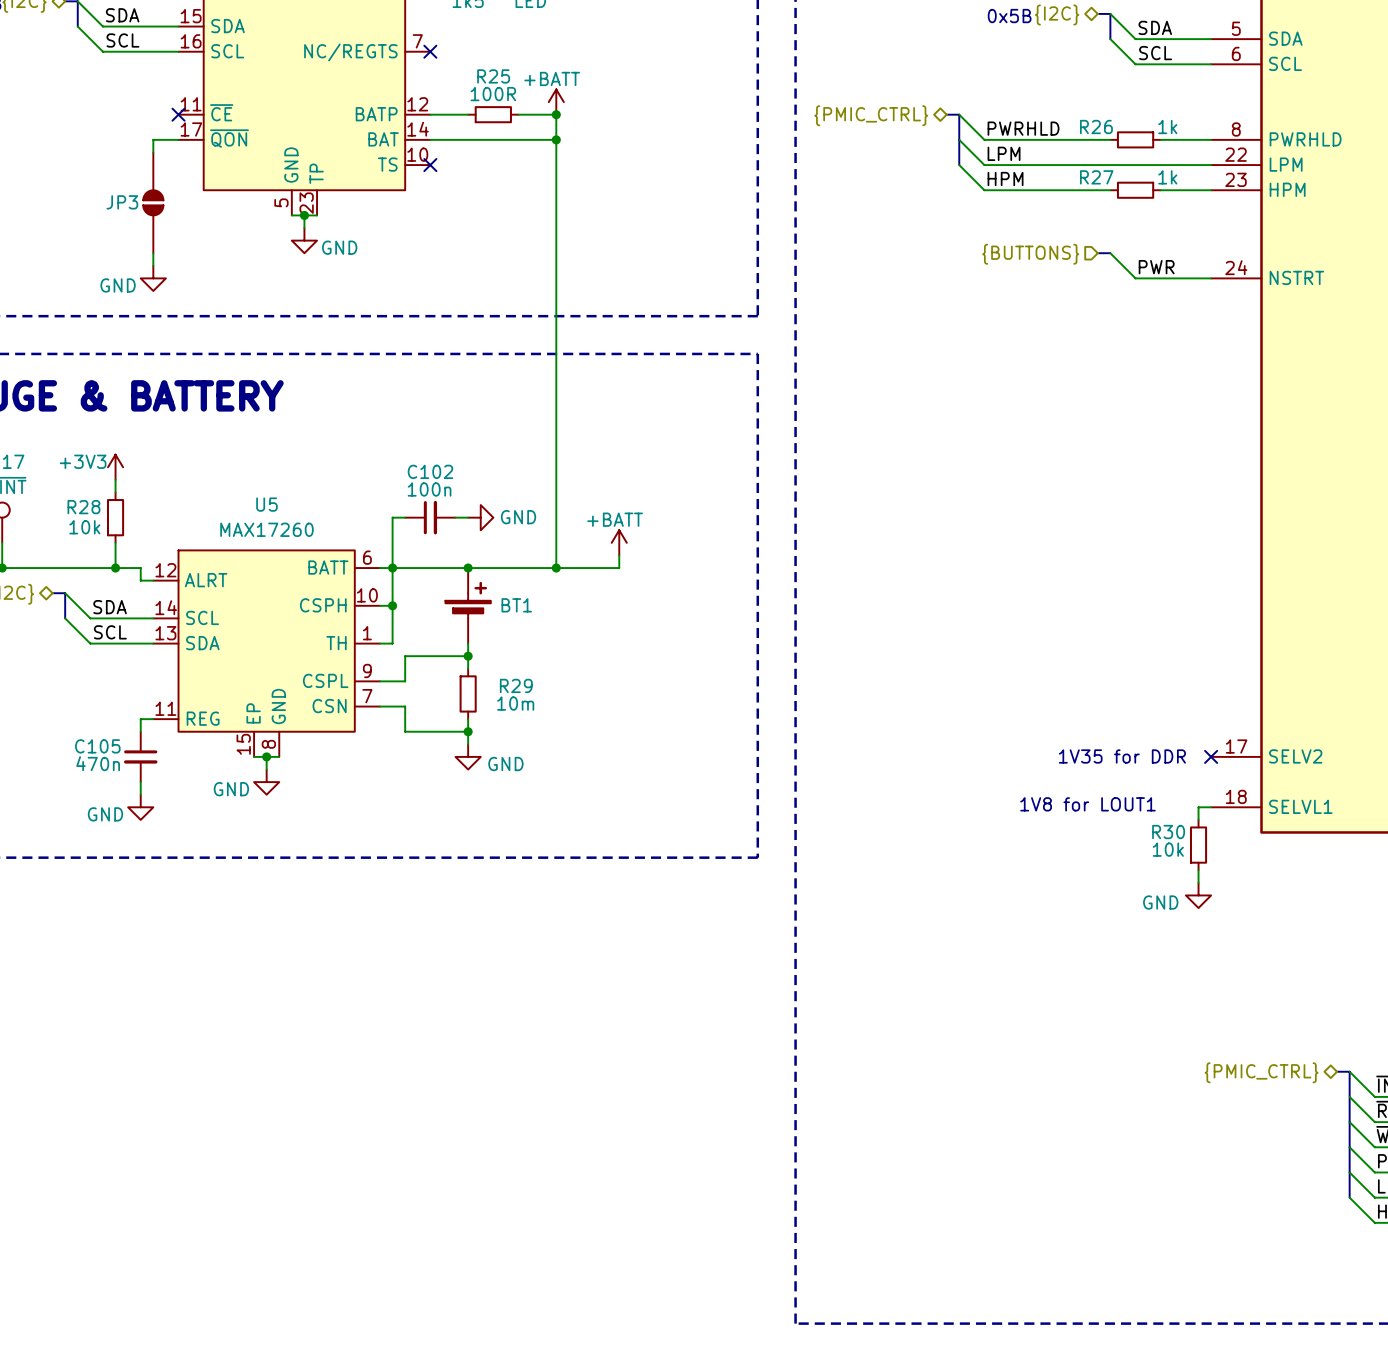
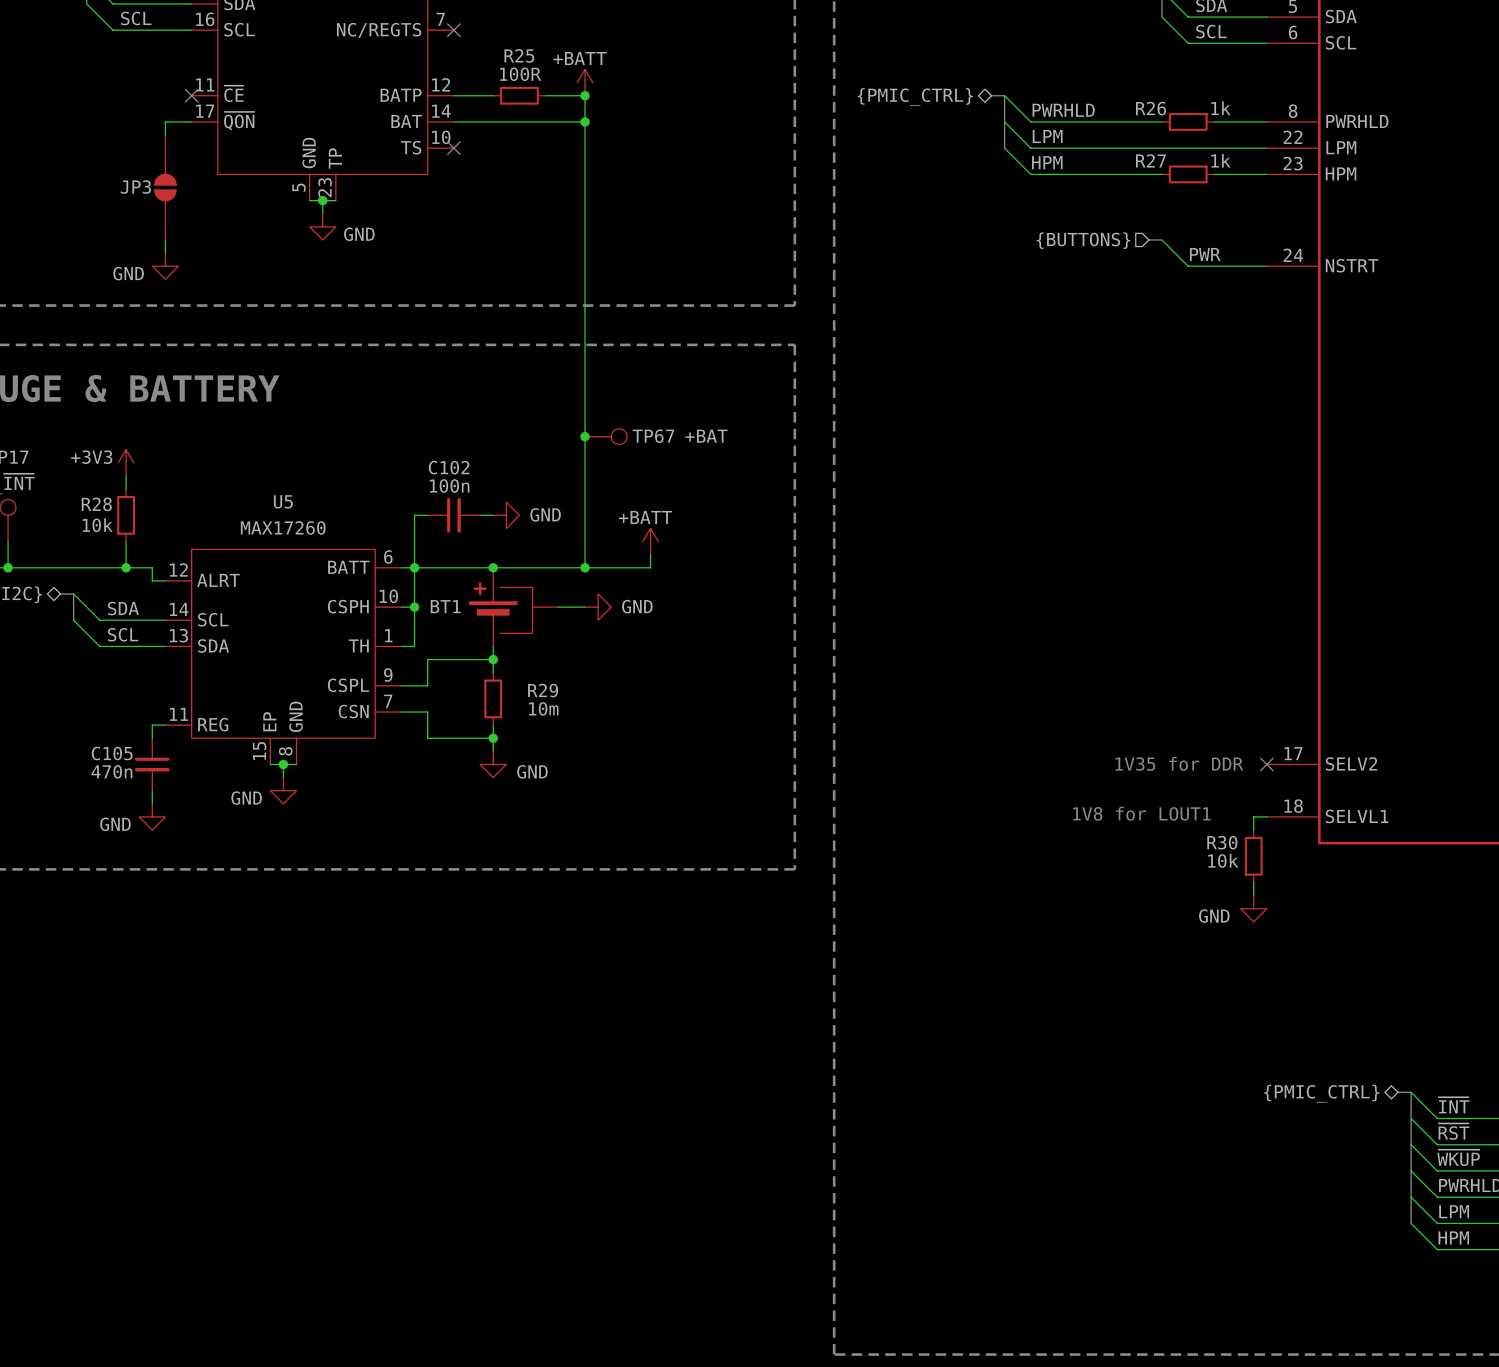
junction: none -> (585, 436)
TP67: none -> +BAT (606, 436)
BT1 symbol: [445, 568, 491, 644] -> [469, 567, 559, 647]
BT1 name position: BT1 (516, 605) -> BT1 (445, 606)
wire: none -> (558, 607) (585, 607)
power symbol: none -> GND (598, 607)

